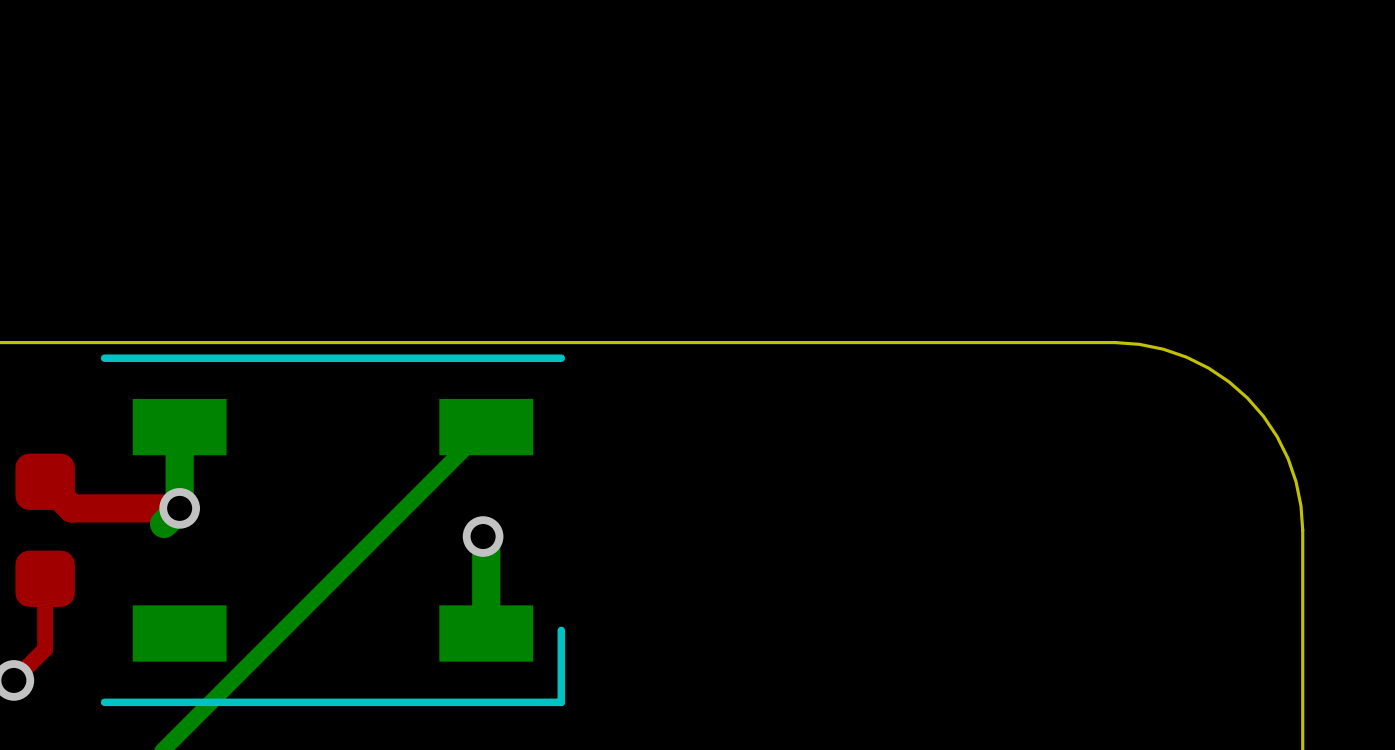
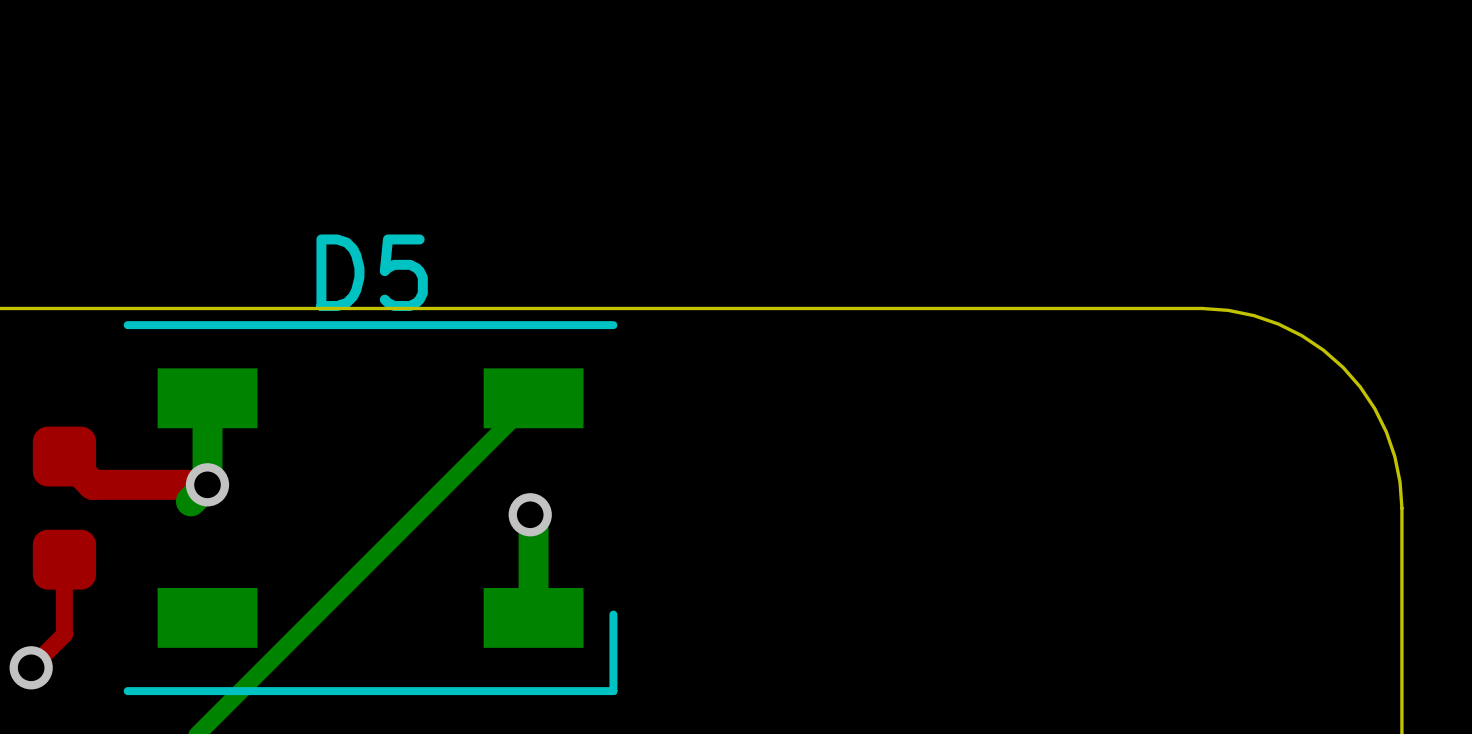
D5 name: none -> D5 (372, 272)

